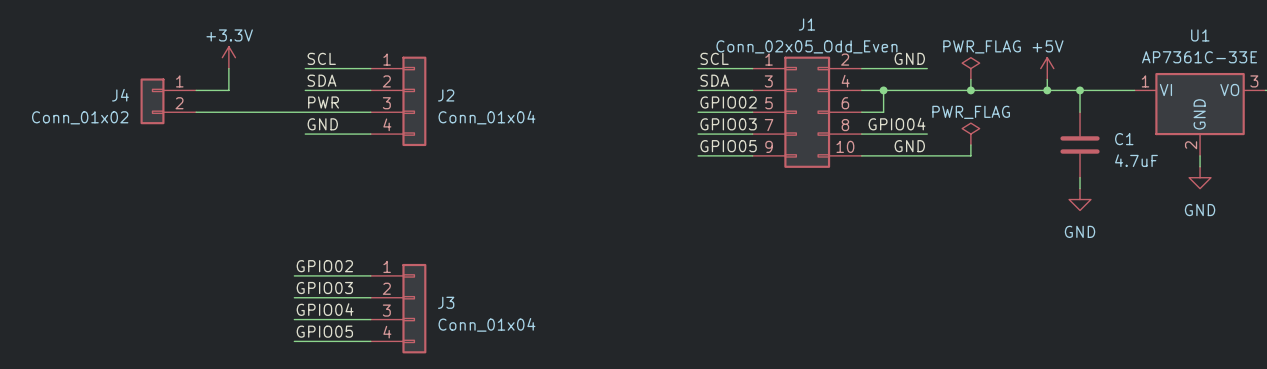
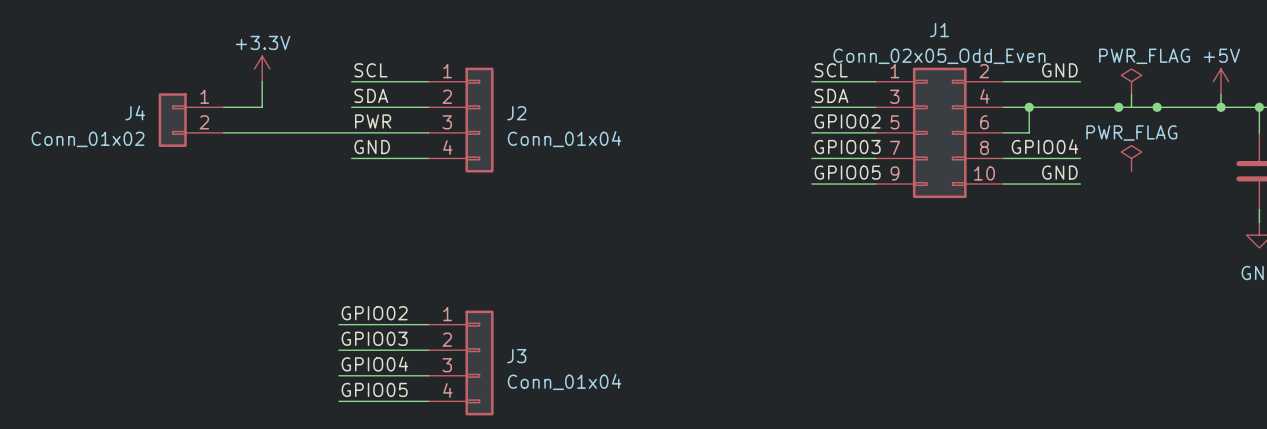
junction: none -> (1118, 107)
junction: (970, 90) -> none
junction: none -> (1157, 107)
wire: (970, 144) (970, 155) (927, 155) -> none

